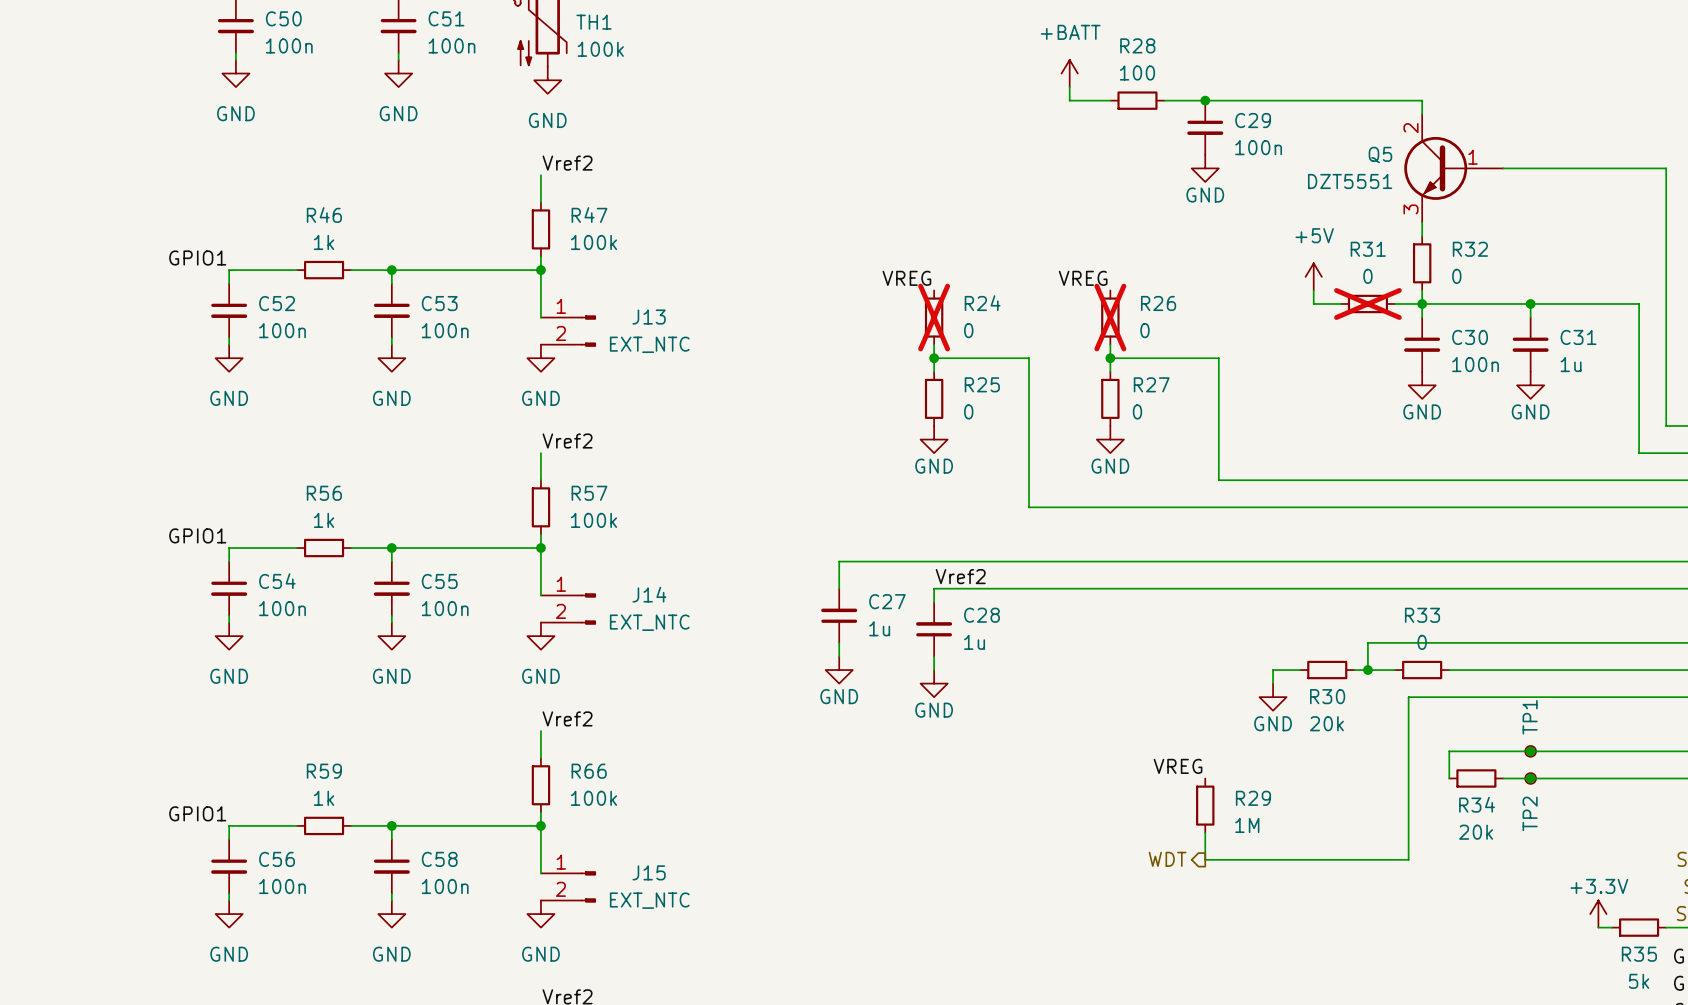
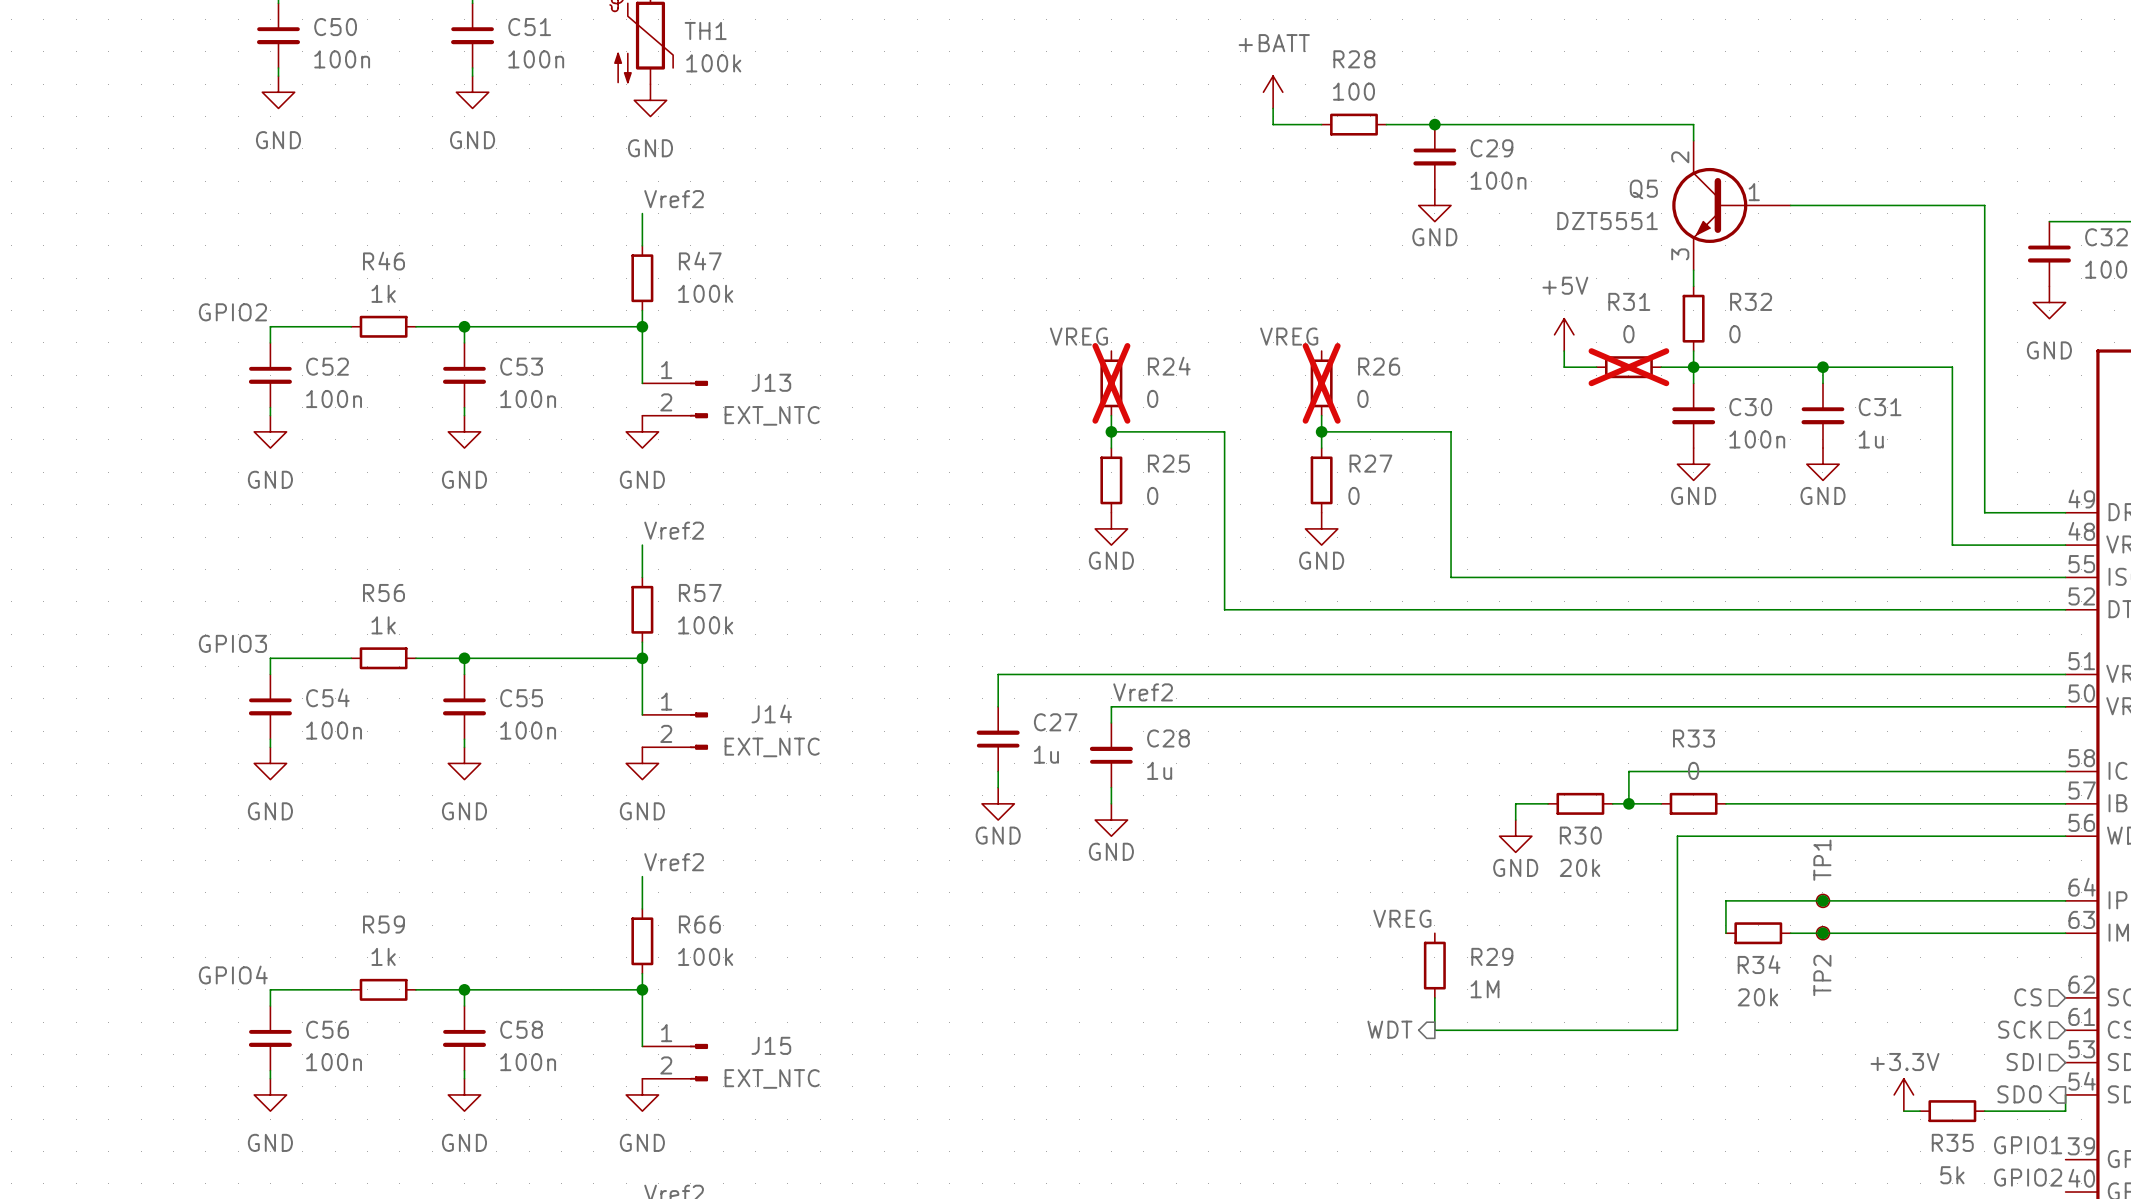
label: GPIO1 (197, 258) -> GPIO2 (232, 312)
label: GPIO1 (197, 535) -> GPIO3 (232, 643)
label: GPIO1 (197, 813) -> GPIO4 (233, 975)

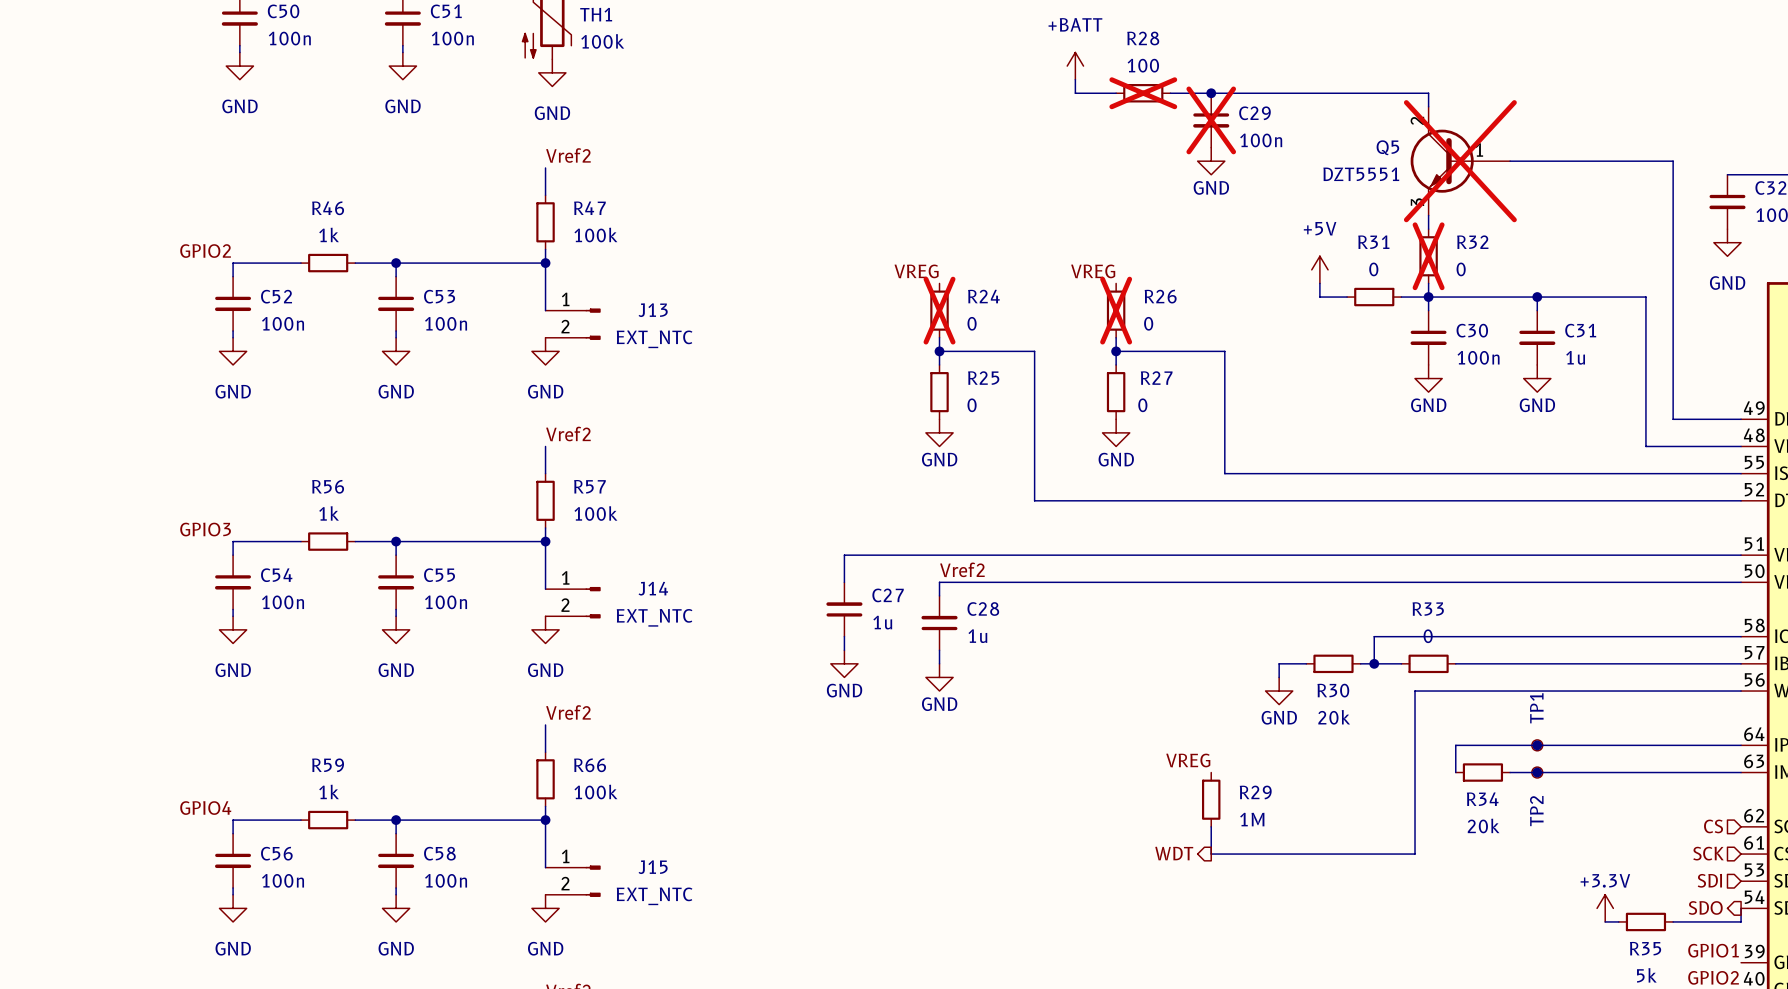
R28 do-not-place cross: none -> (1143, 93)
C29 do-not-place cross: none -> (1211, 120)
Q5 do-not-place cross: none -> (1460, 161)
R32 do-not-place cross: none -> (1428, 256)
R31 do-not-place cross: (1628, 367) -> none

